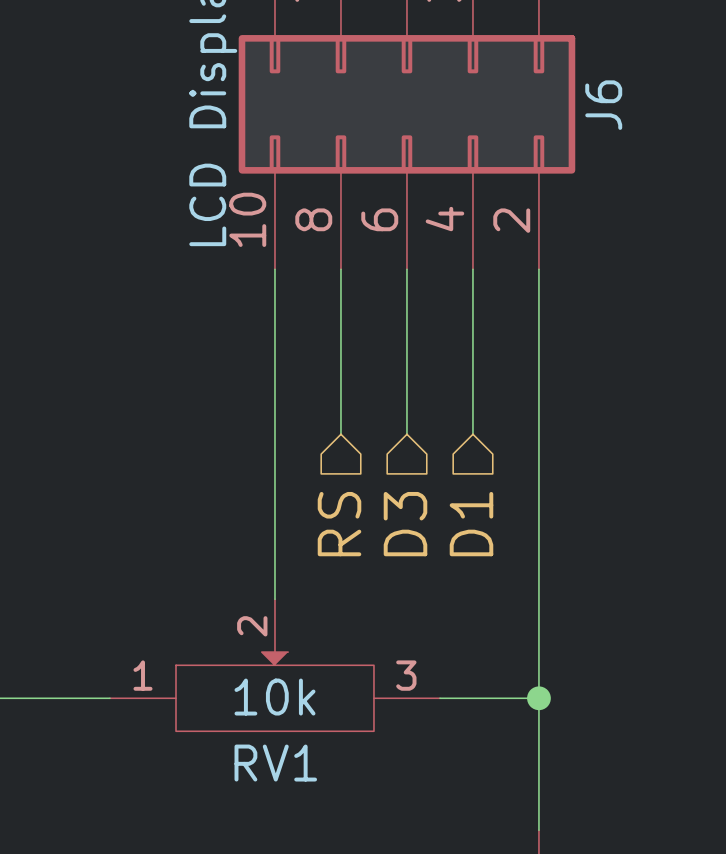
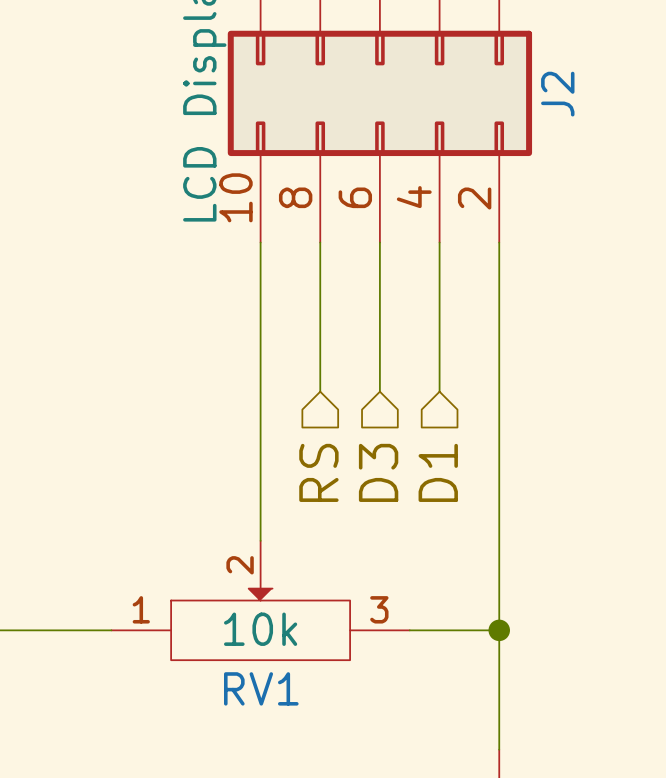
J6 name: J6 (603, 105) -> J2 (557, 94)

